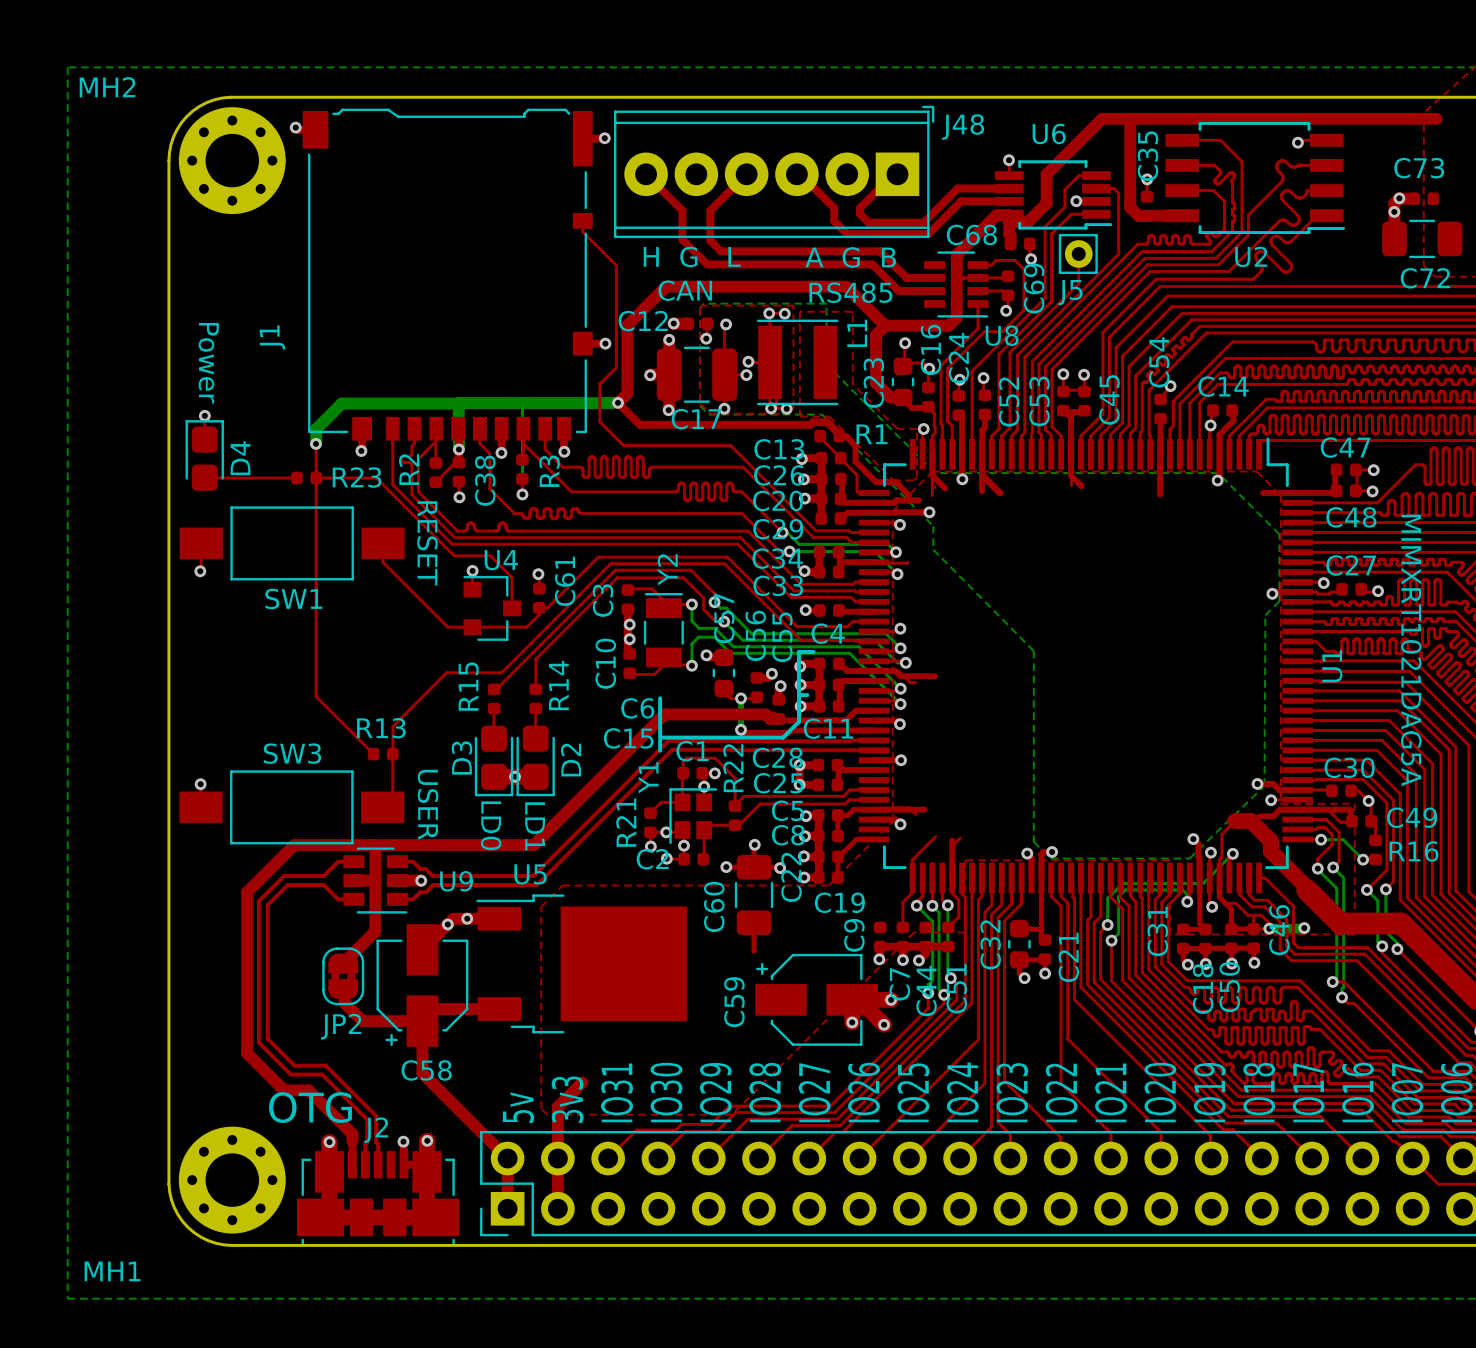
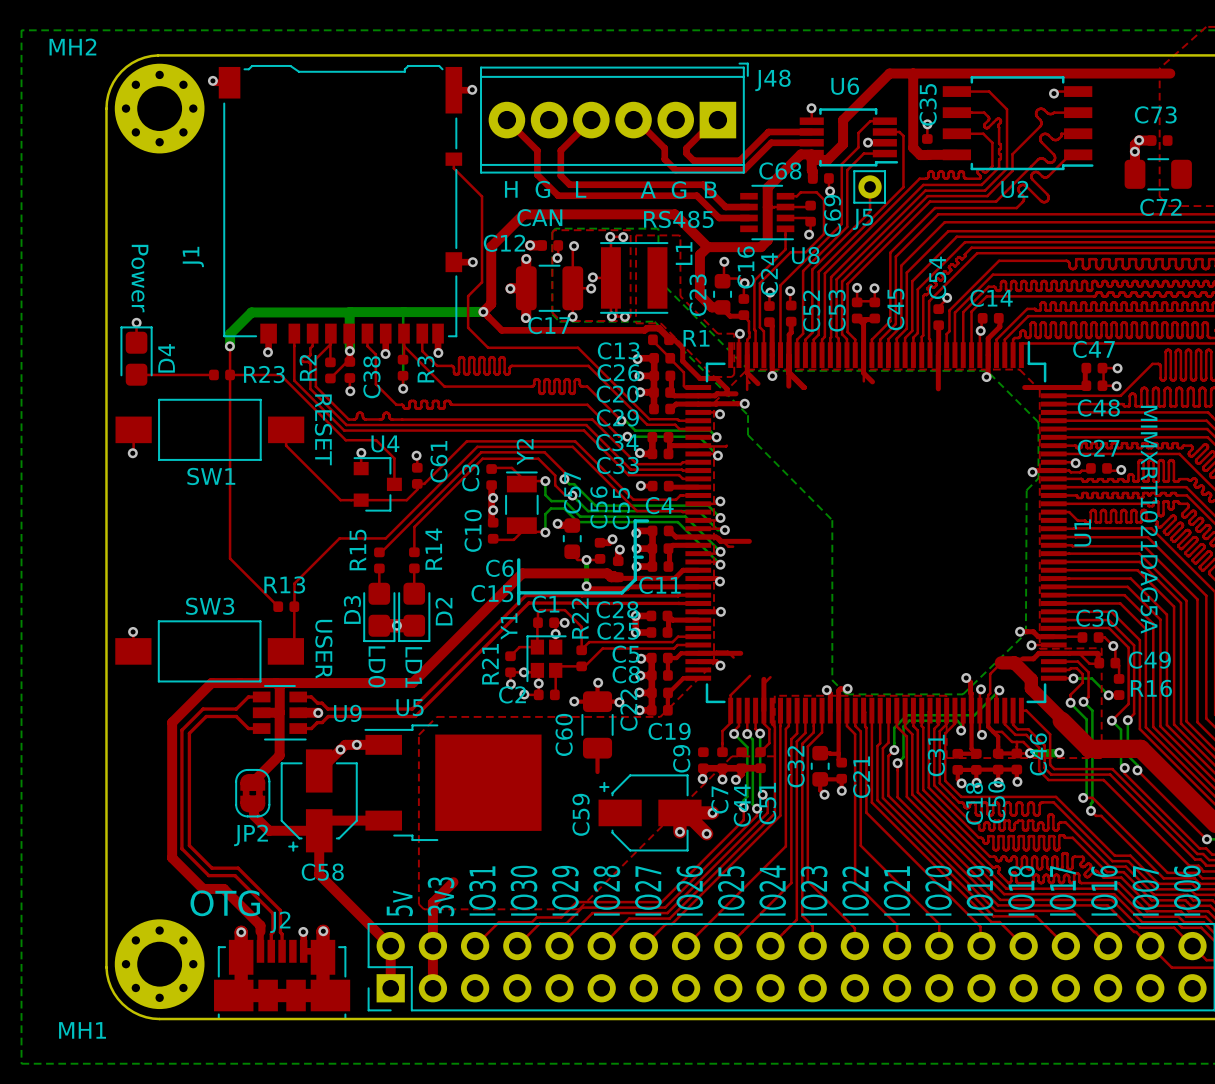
MH2 name position: MH2 (107, 87) -> MH2 (72, 47)
MH1 name position: MH1 (112, 1271) -> MH1 (82, 1030)

